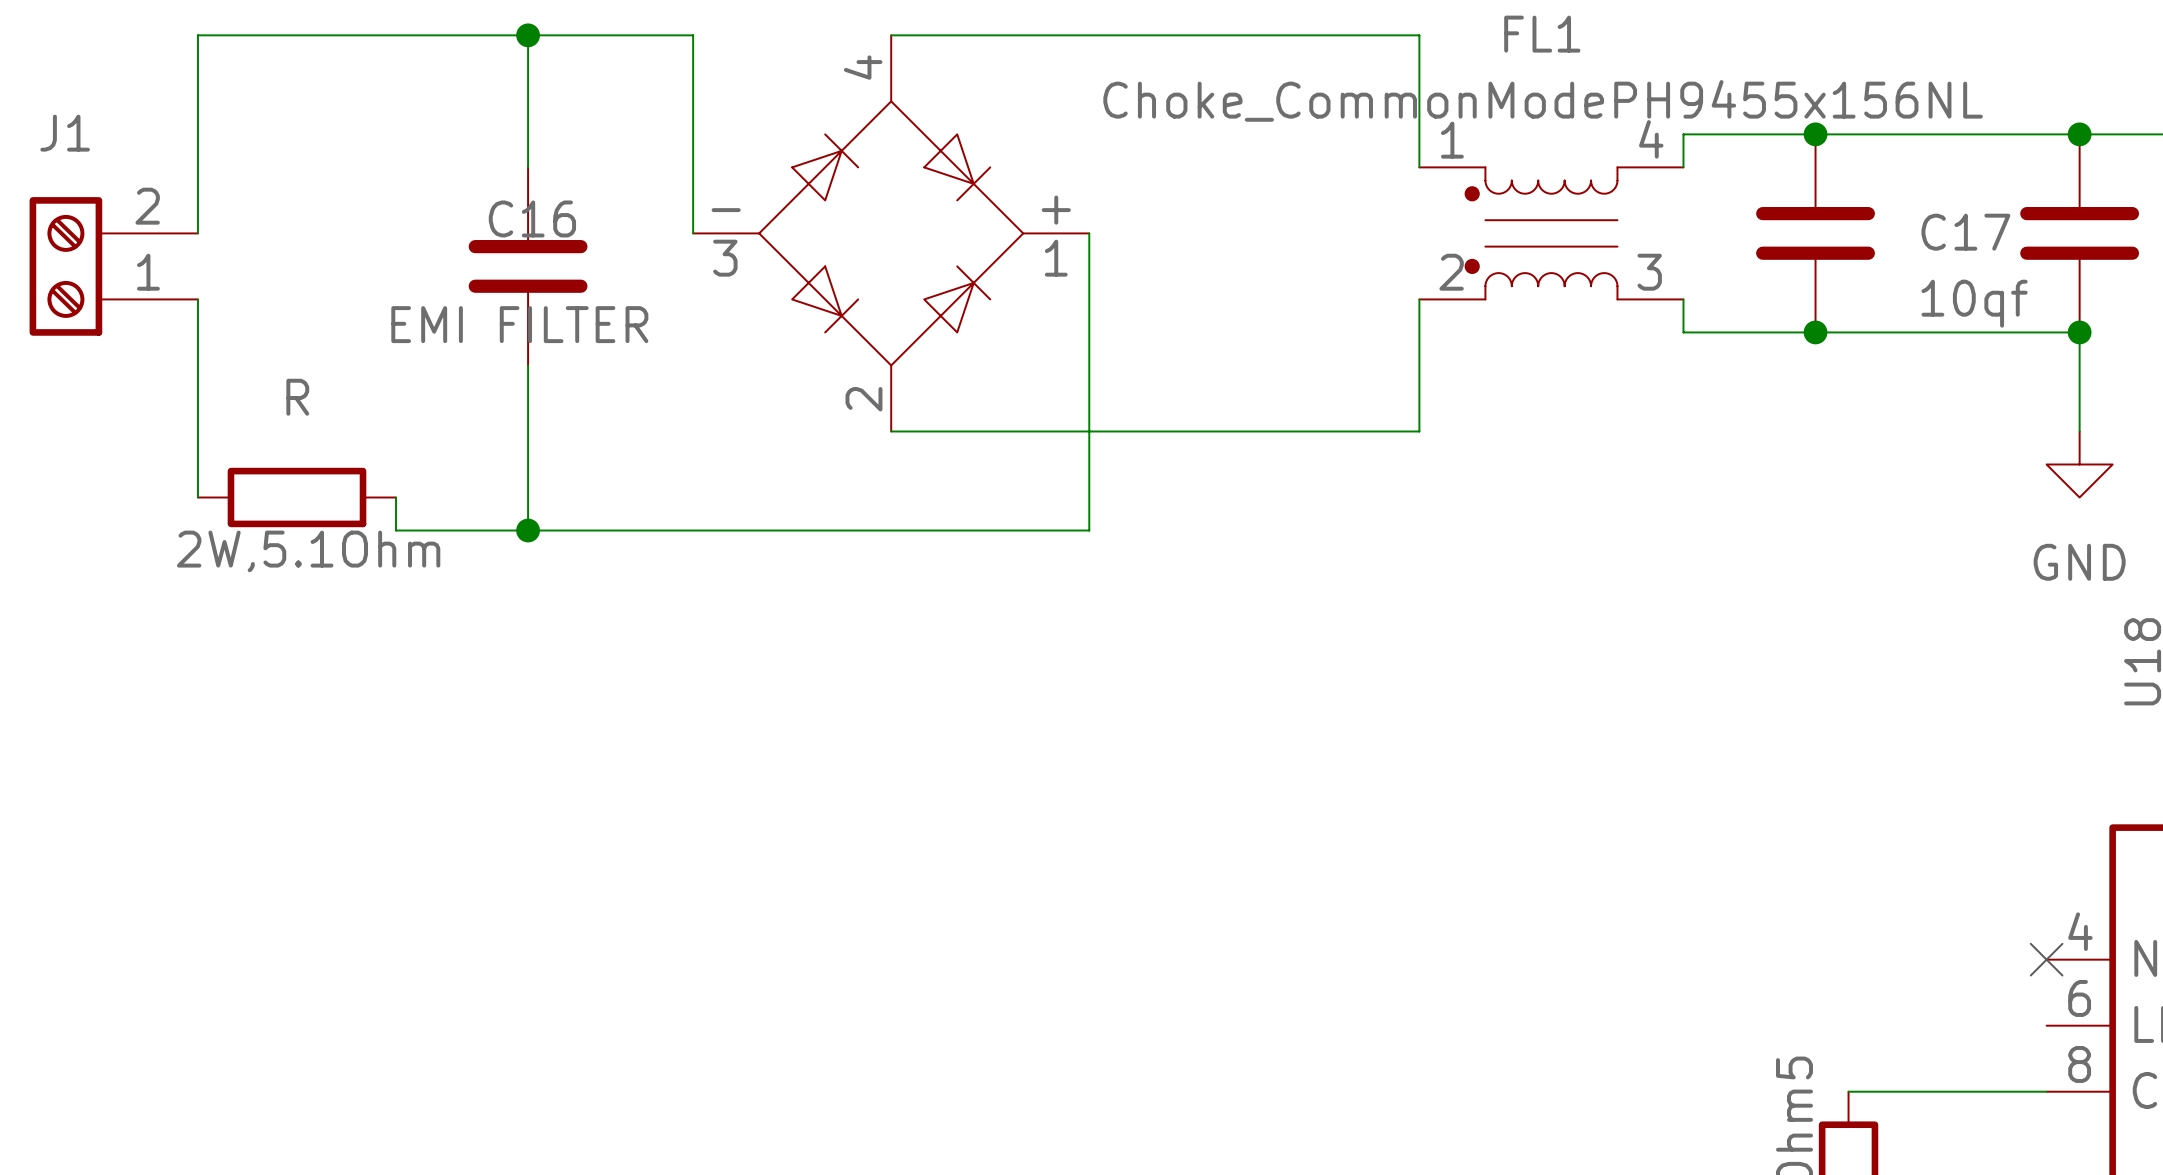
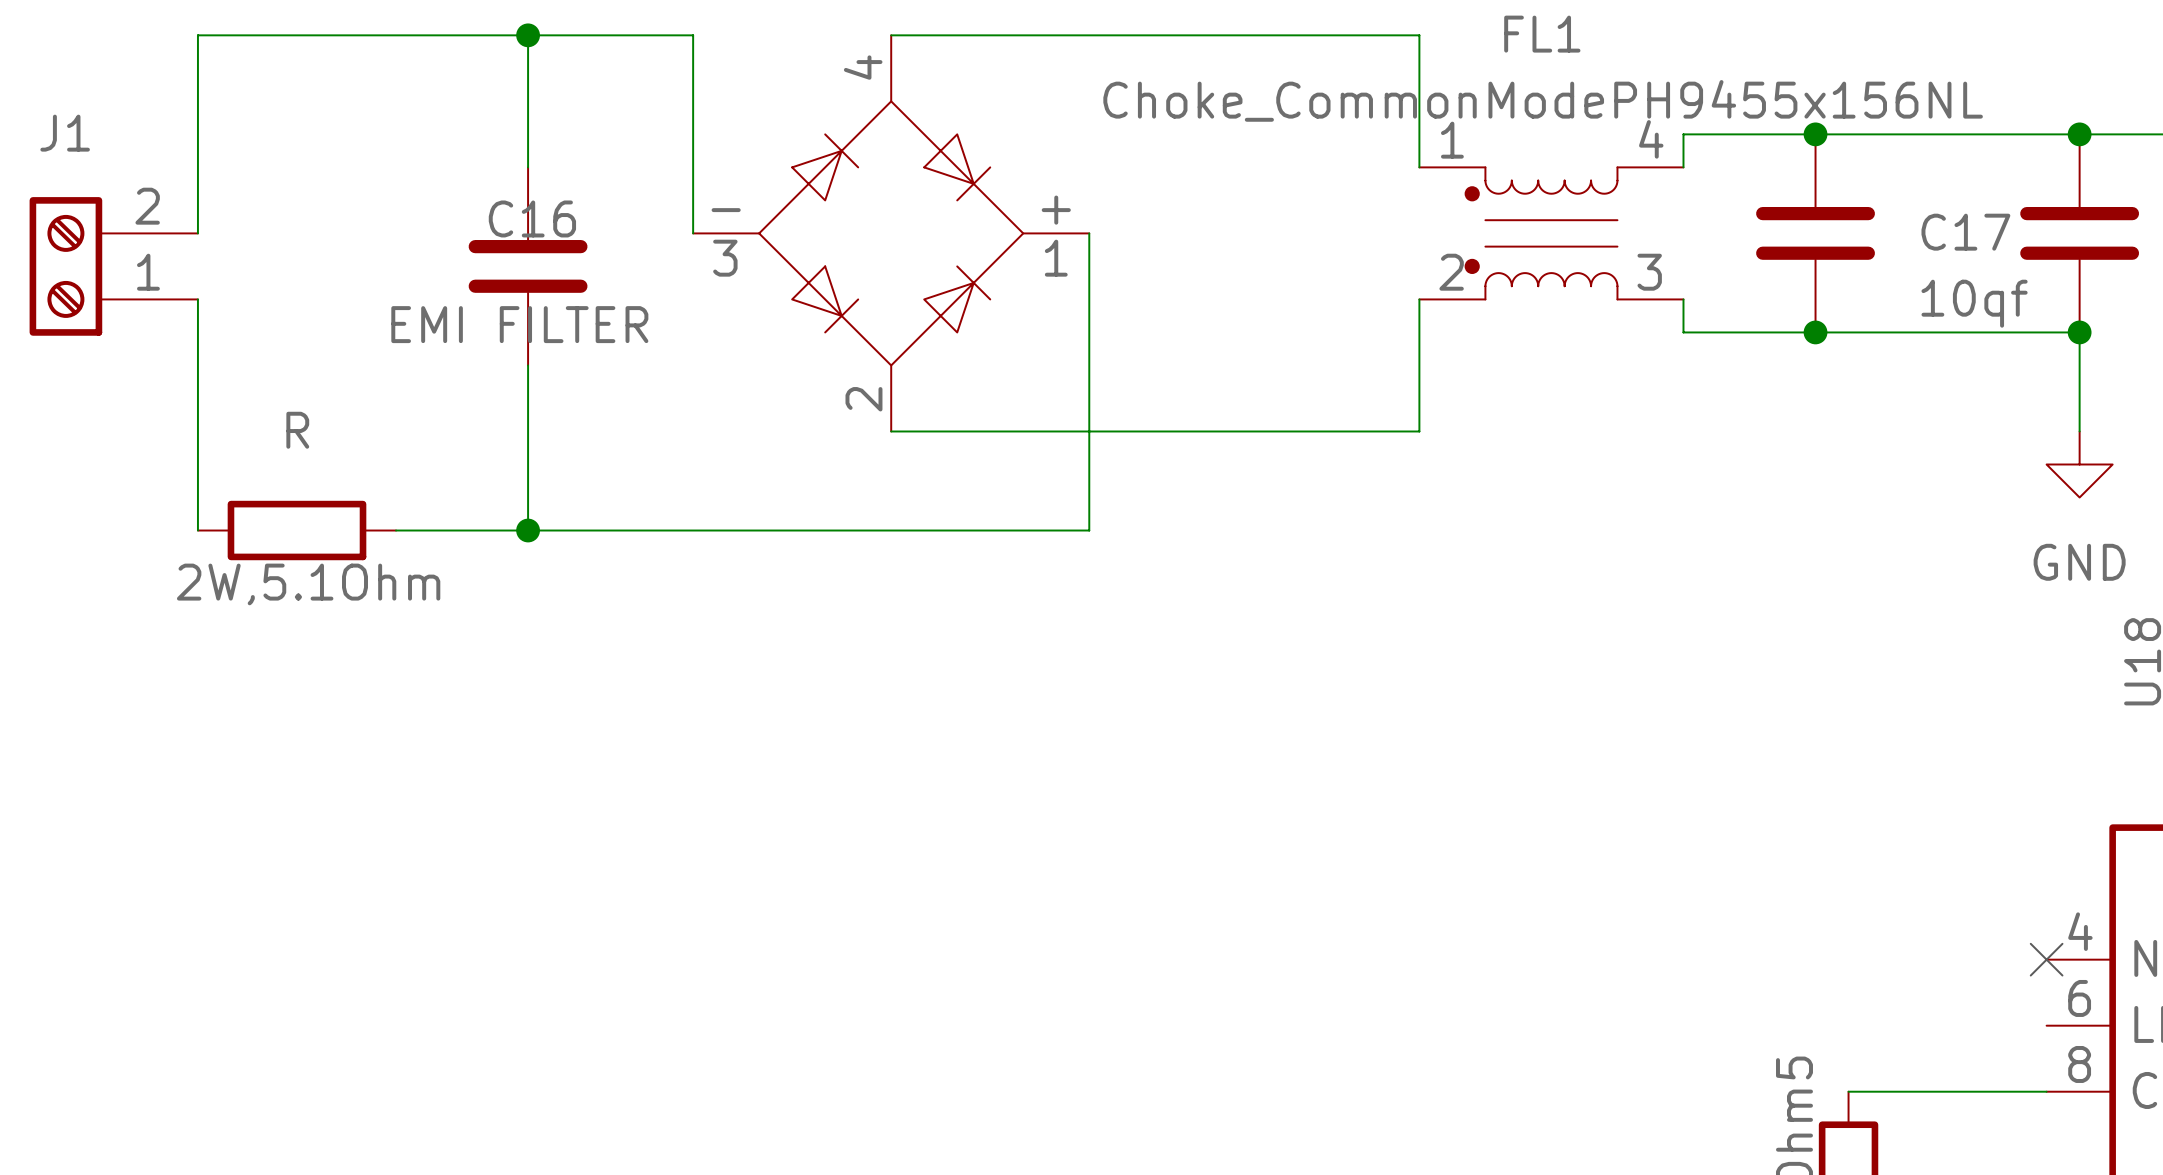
2W,5.1Ohm position: (296, 497) -> (296, 530)
wire: (396, 497) (396, 530) -> (197, 497) (197, 530)

